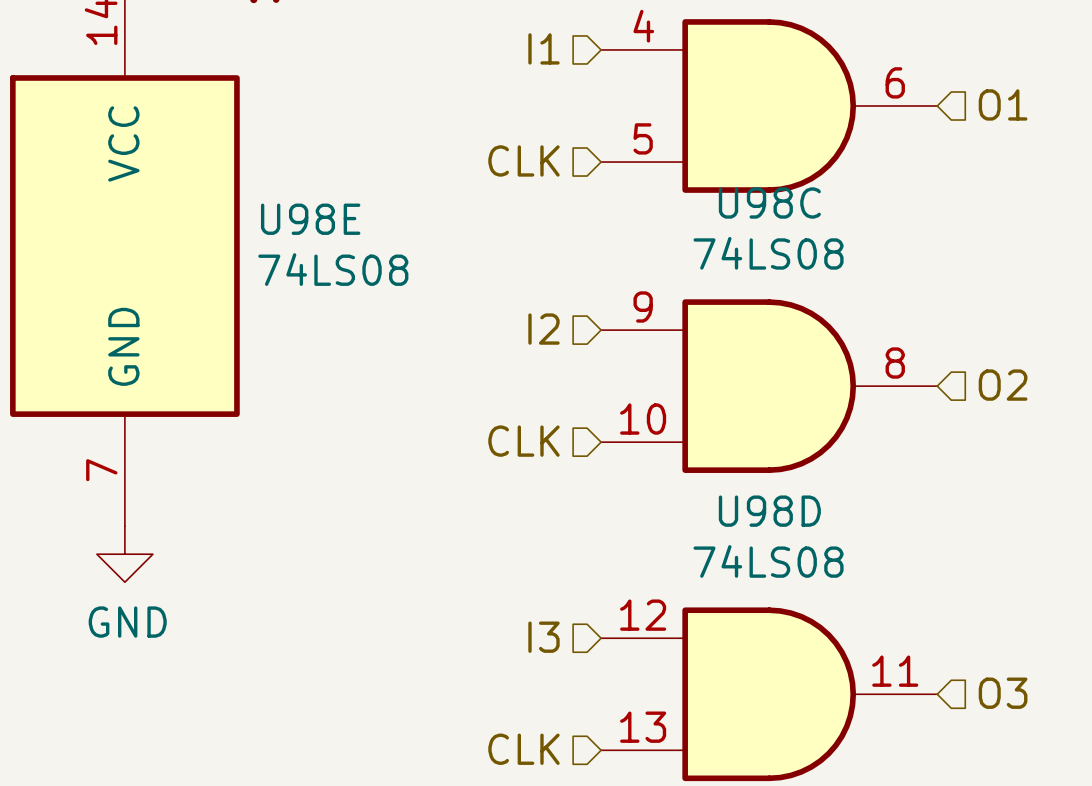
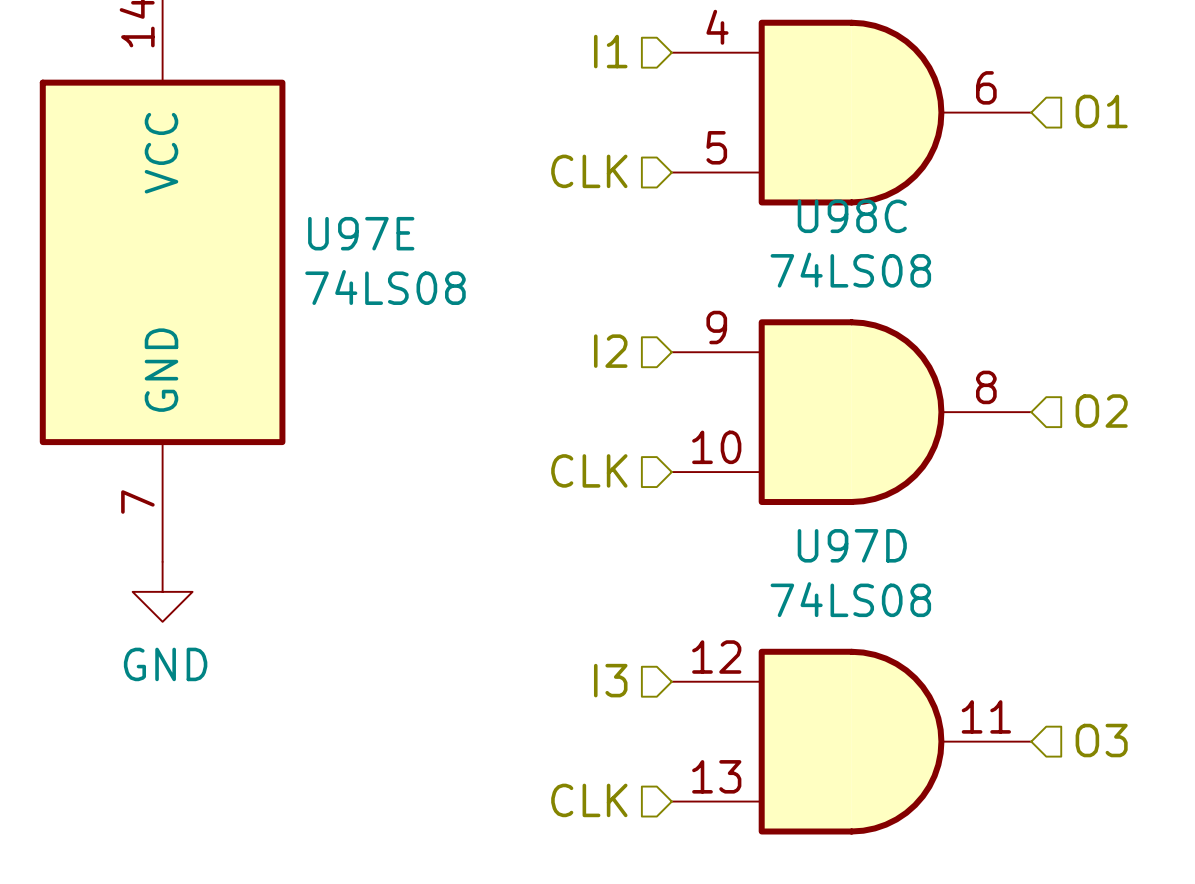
U98E name: U98E (310, 219) -> U97E (361, 233)
U98D name: U98D (769, 511) -> U97D (852, 545)

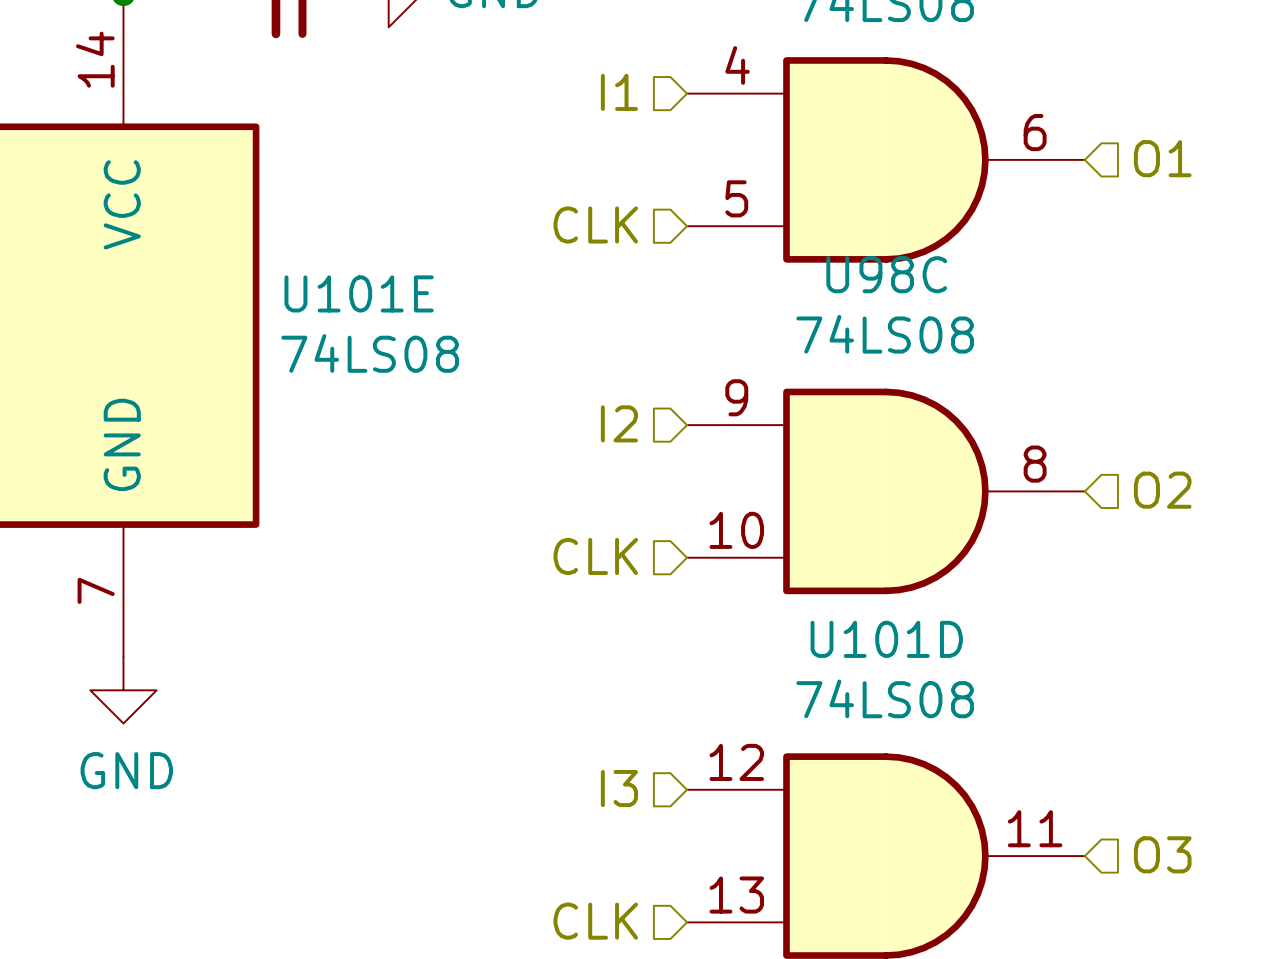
U97E name: U97E (361, 233) -> U101E (359, 293)
U97D name: U97D (852, 545) -> U101D (886, 639)

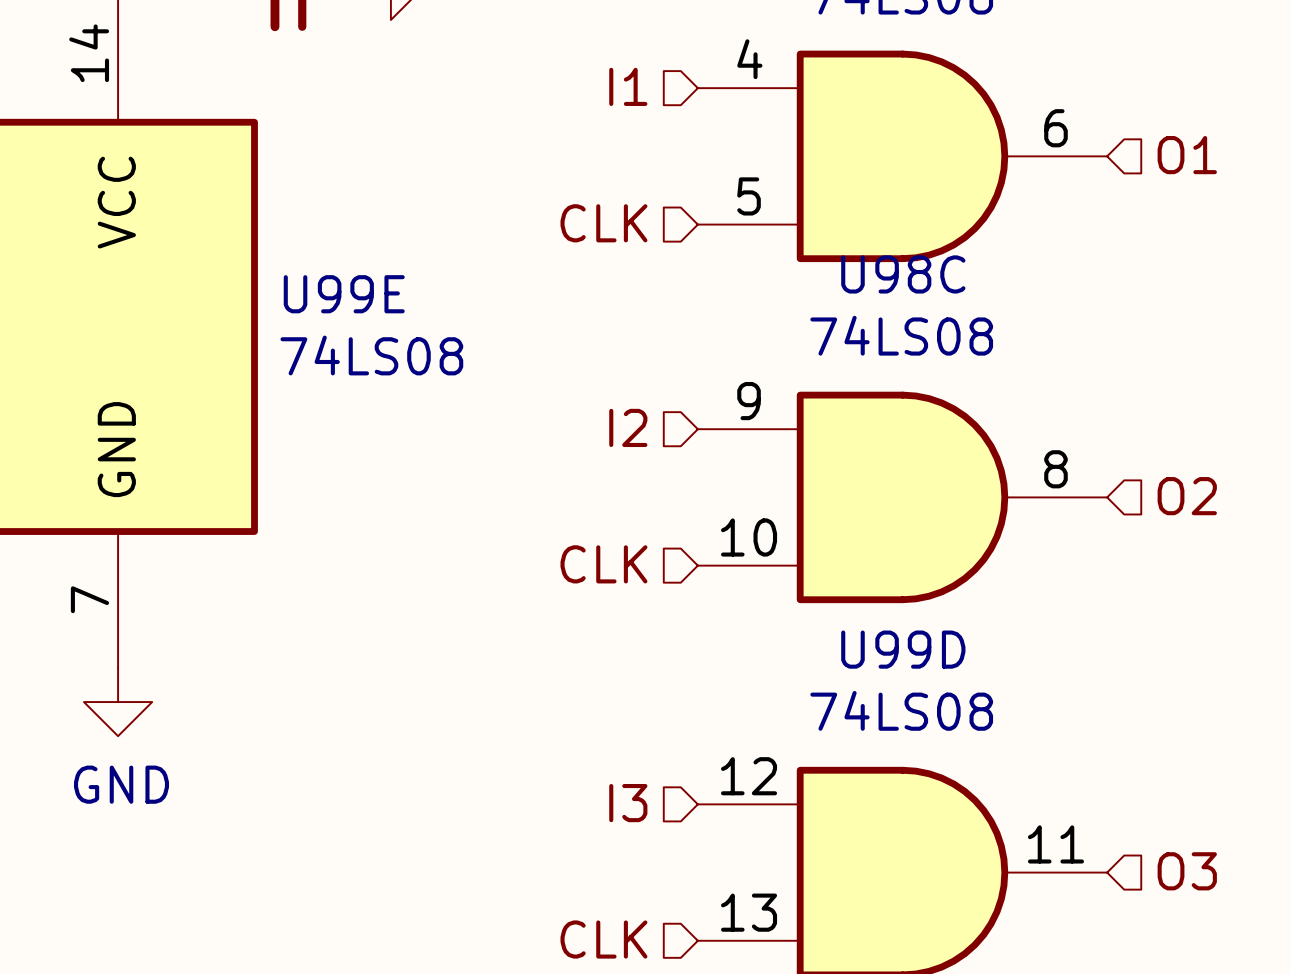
U101E name: U101E (359, 293) -> U99E (344, 294)
U101D name: U101D (886, 639) -> U99D (903, 649)

